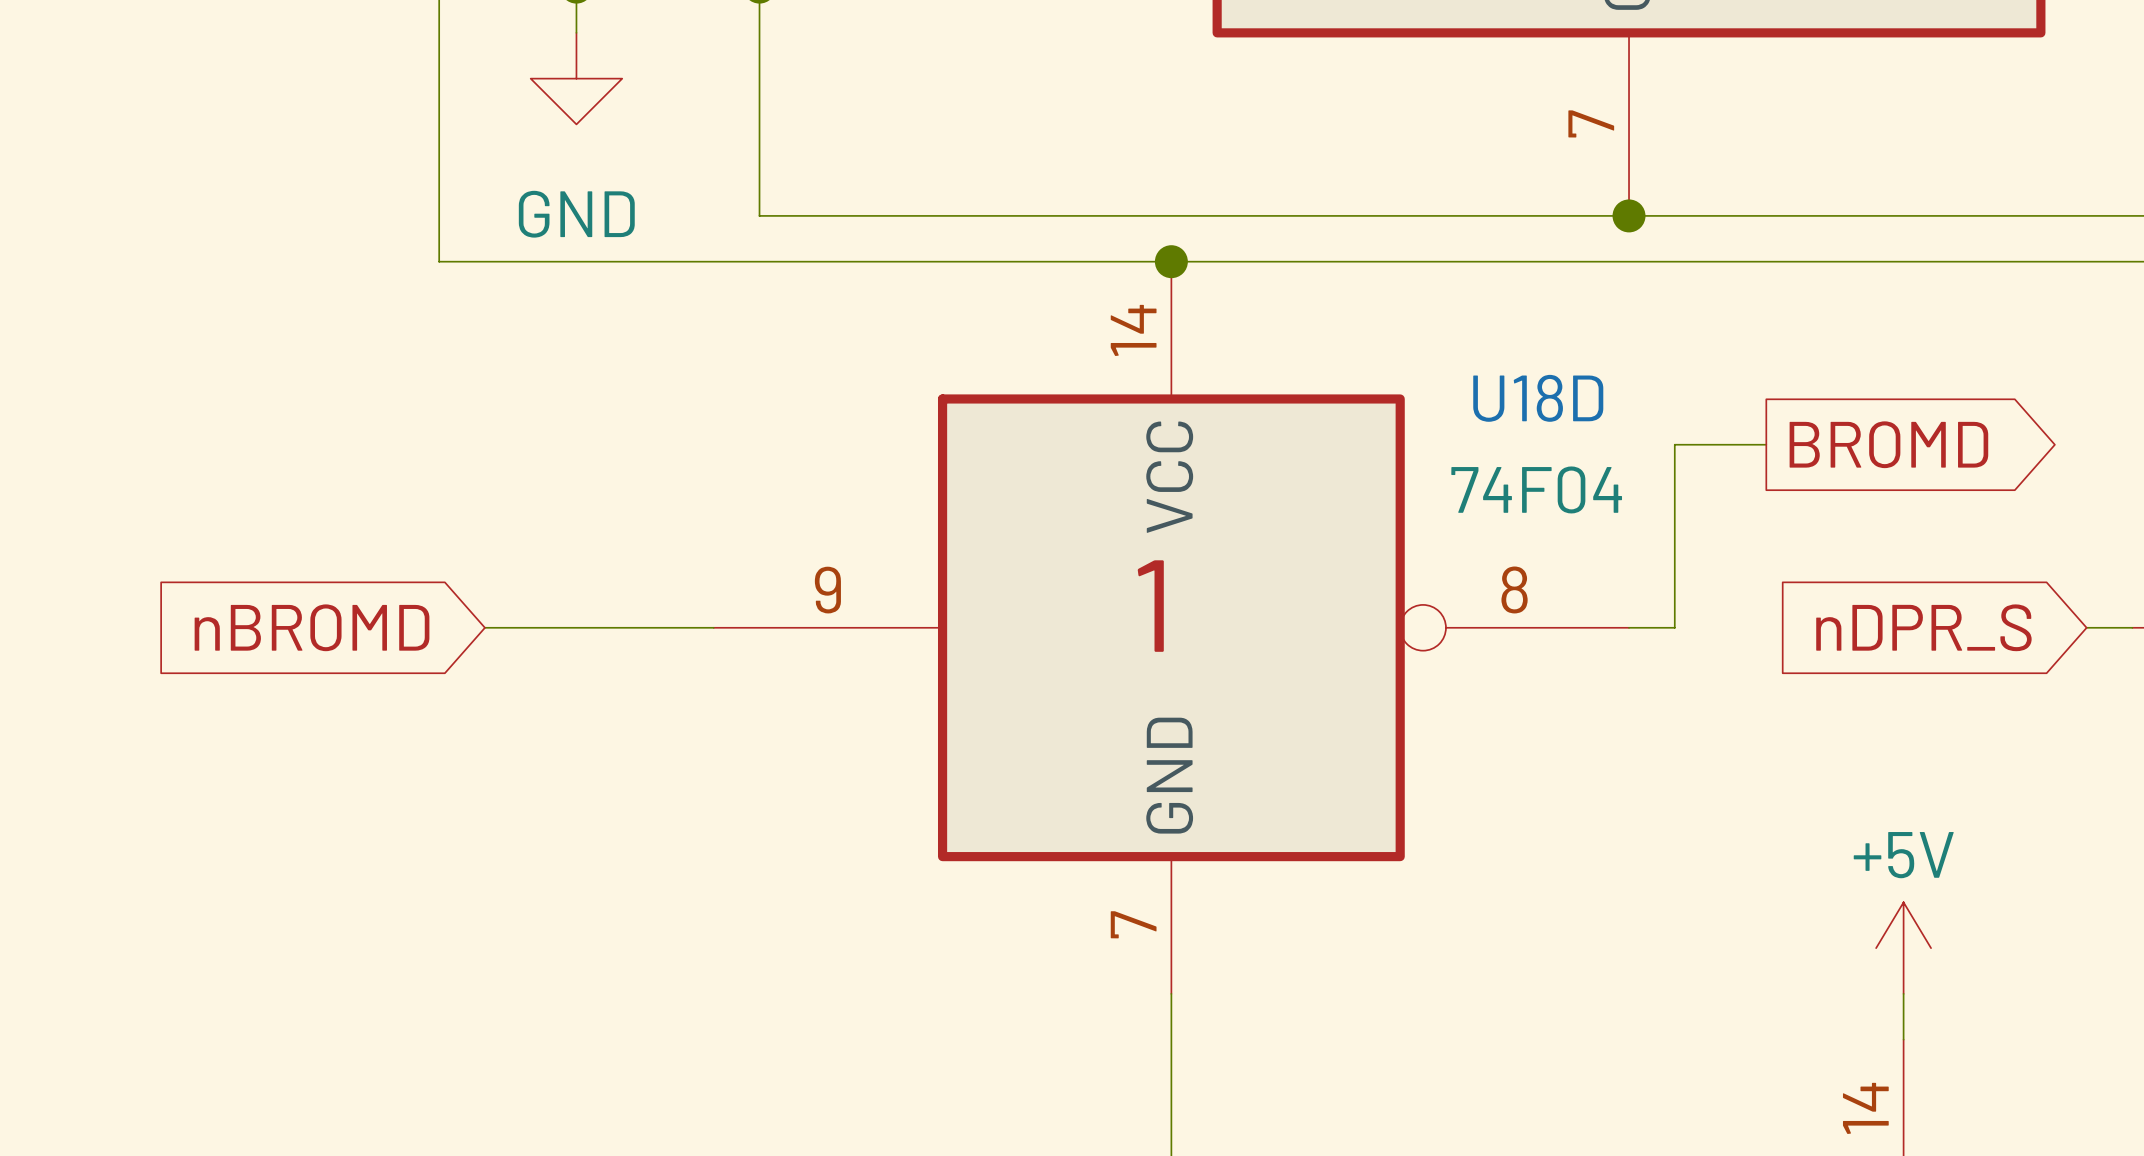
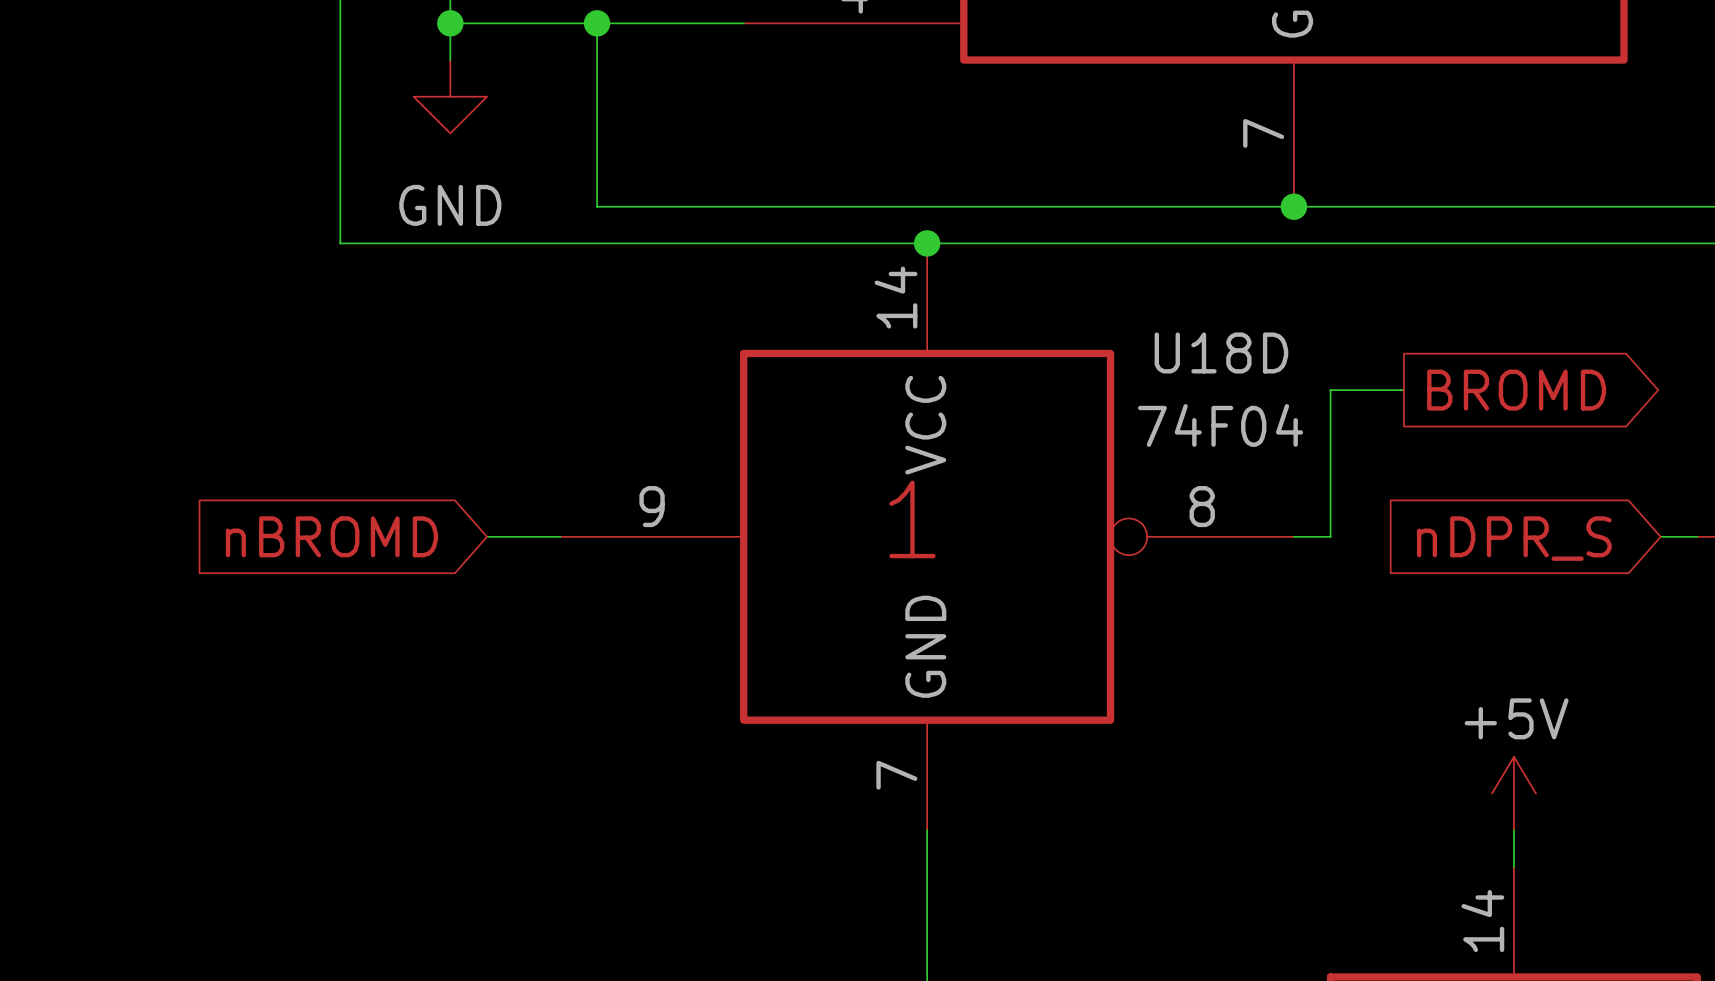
global label position: nBROMD (312, 627) -> nBROMD (331, 536)
wire: (484, 627) (622, 627) -> none

